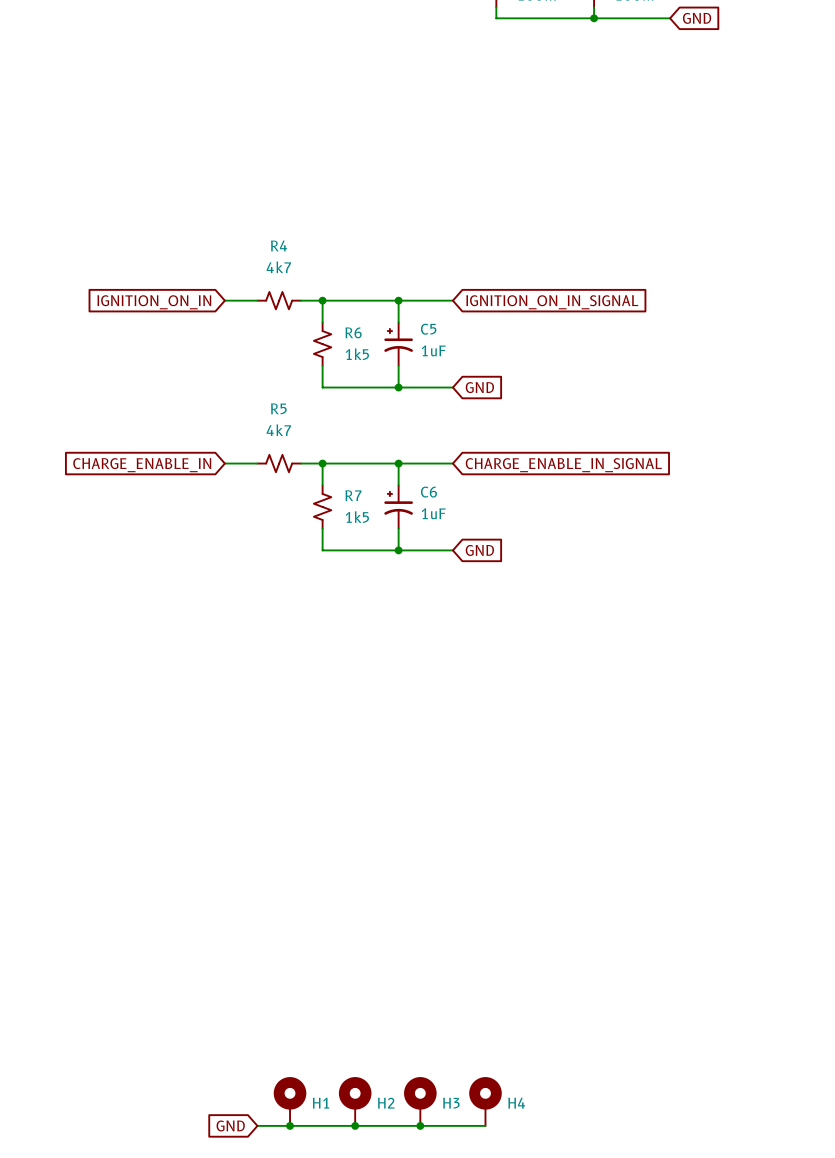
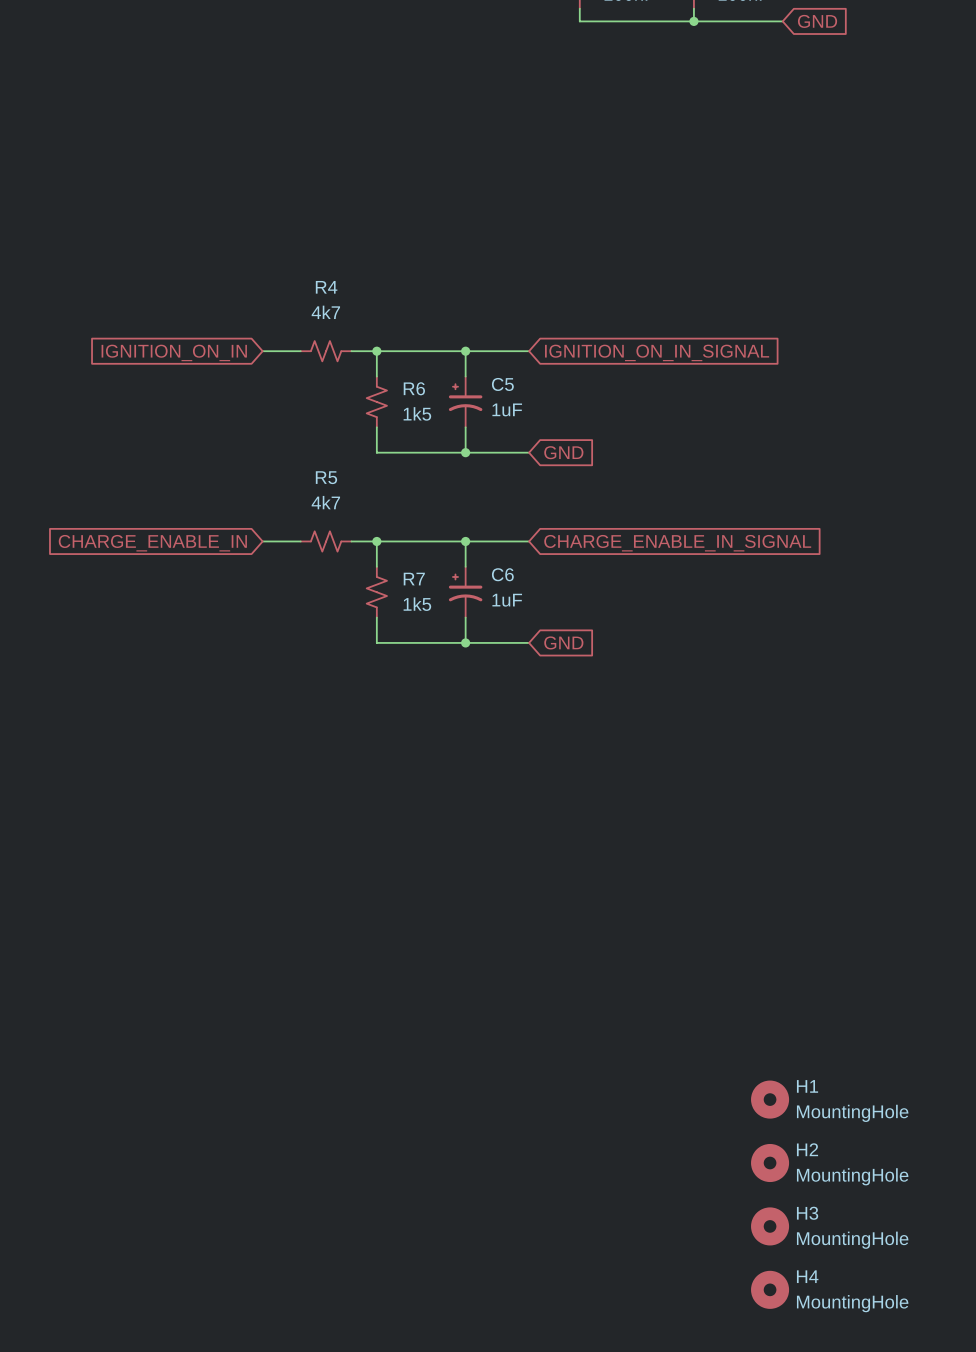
H1 value: none -> MountingHole (852, 1113)
H2 value: none -> MountingHole (852, 1176)
H3 value: none -> MountingHole (852, 1240)
H1 symbol: [273, 1077, 307, 1126] -> [751, 1080, 790, 1119]
H2 symbol: [338, 1077, 372, 1126] -> [751, 1143, 790, 1183]
H3 symbol: [404, 1077, 437, 1126] -> [751, 1207, 790, 1246]
H4 symbol: [469, 1077, 502, 1126] -> [751, 1270, 790, 1309]
H4 value: none -> MountingHole (852, 1303)
global label: GND (230, 1125) -> none
wire: (257, 1125) (485, 1125) -> none
junction: (290, 1125) -> none
junction: (355, 1125) -> none
junction: (420, 1125) -> none

